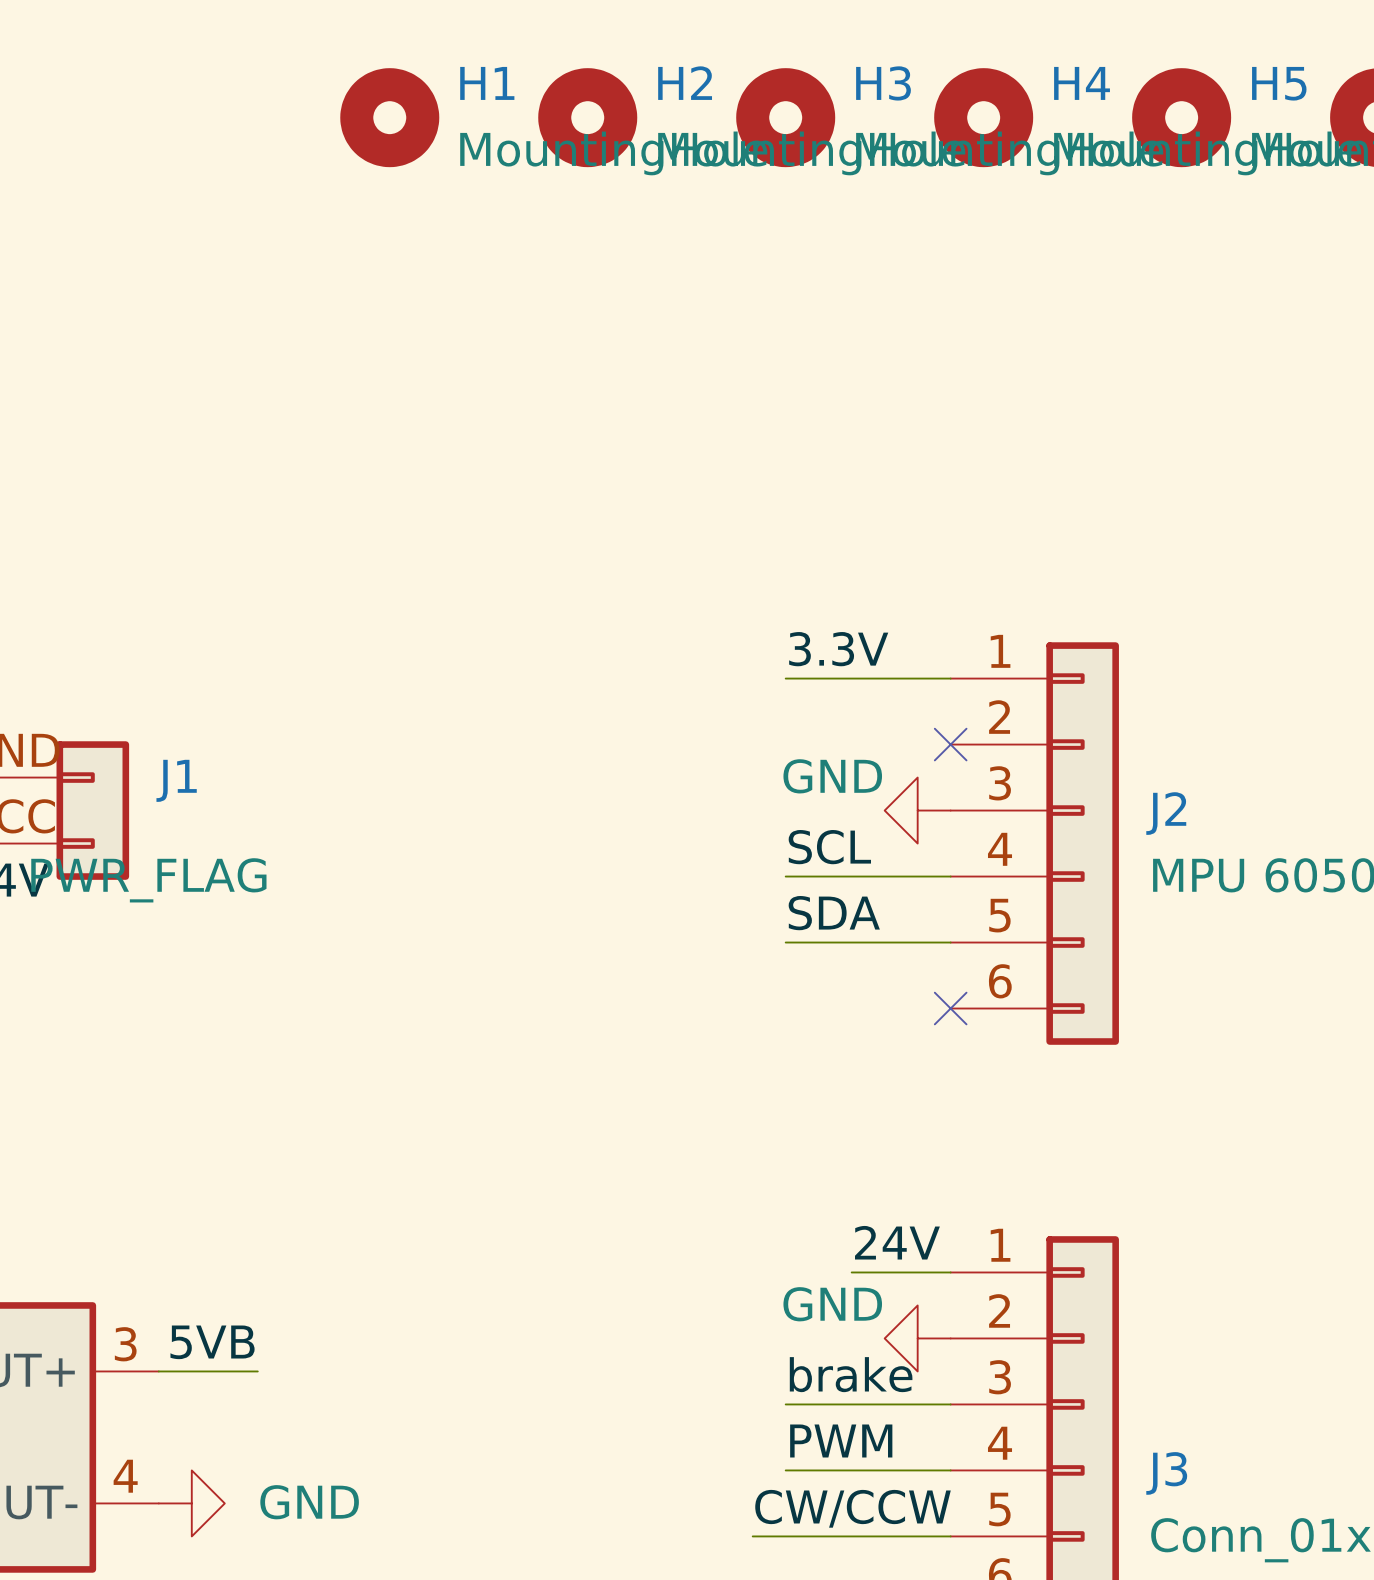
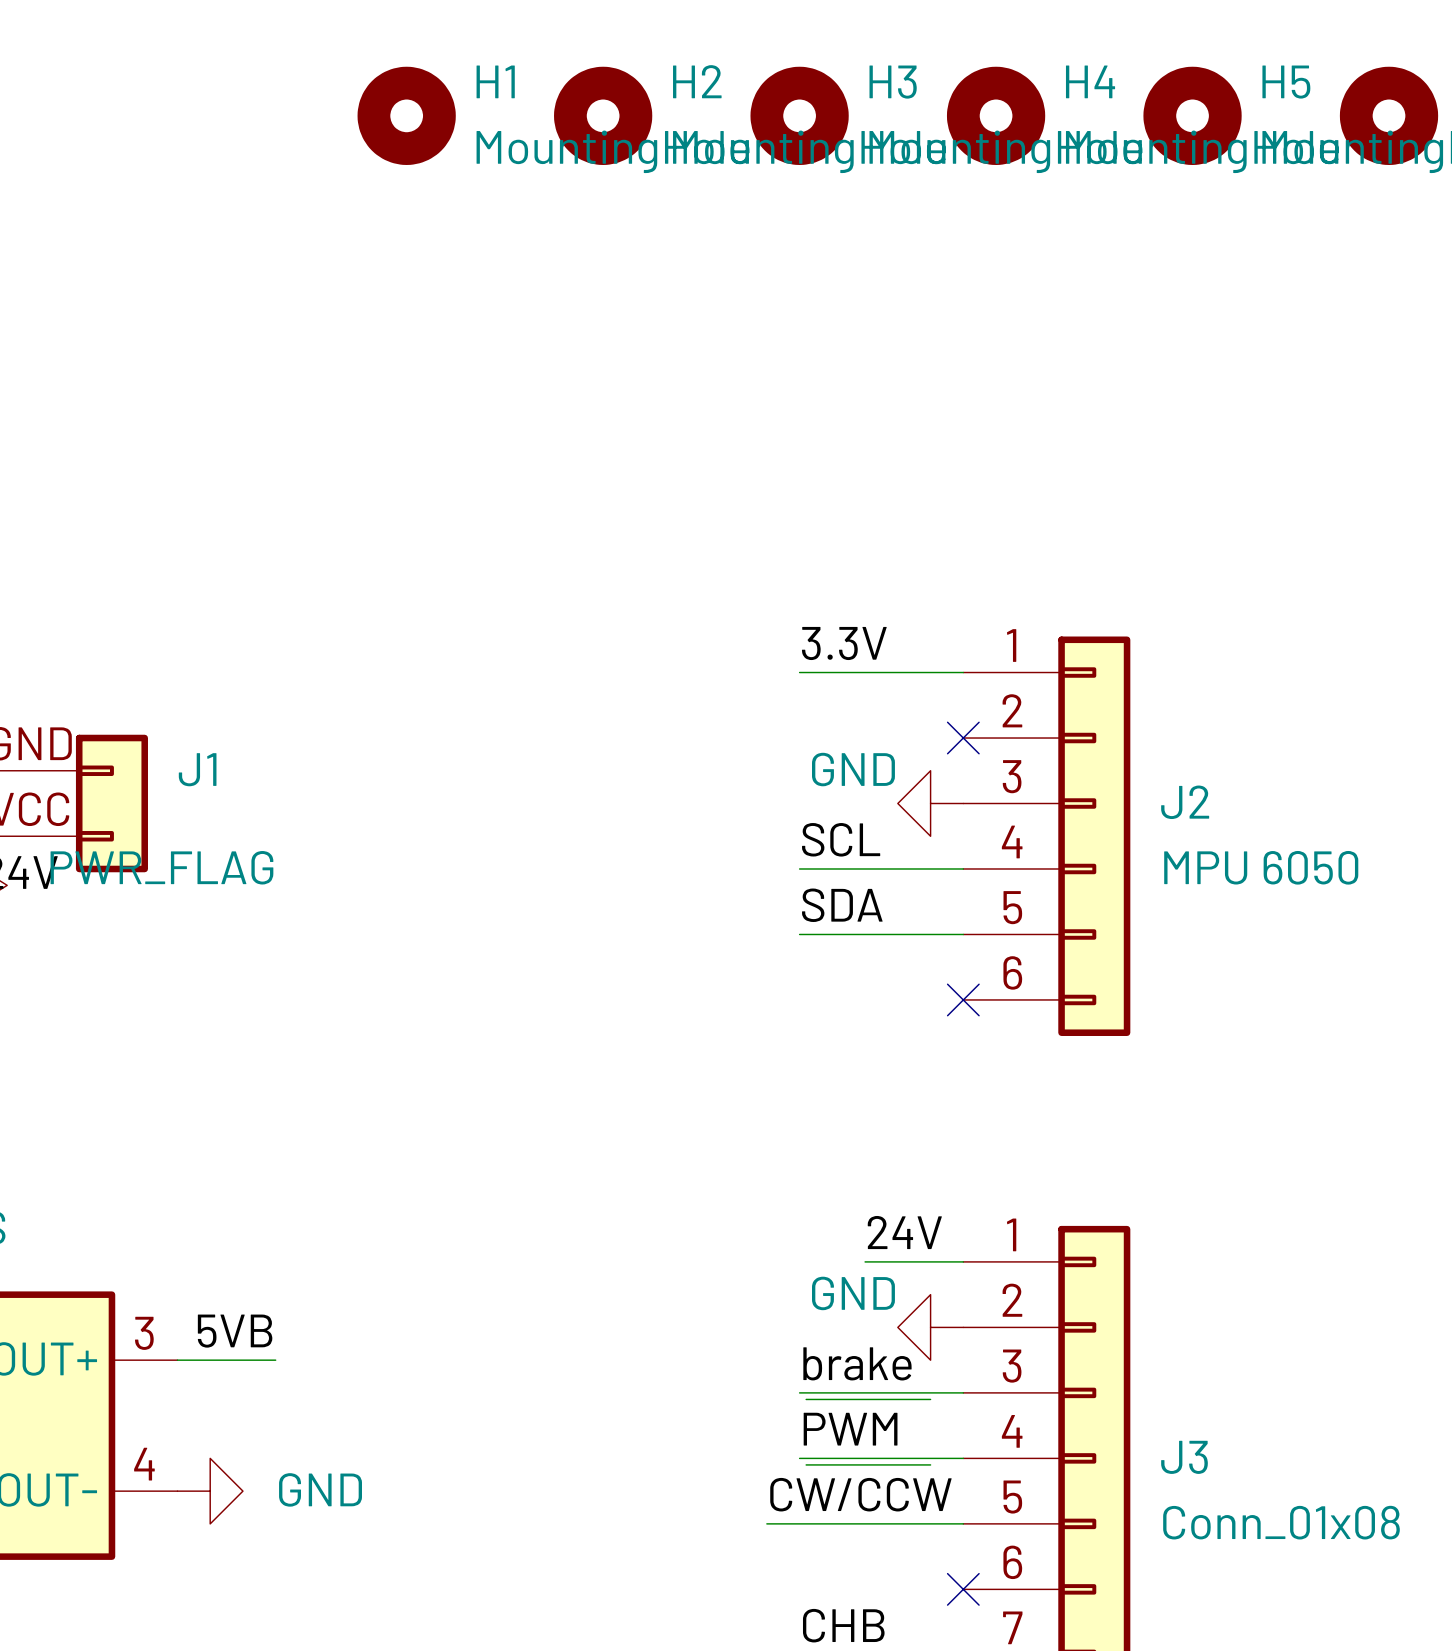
wire: none -> (806, 1399) (930, 1399)
wire: none -> (806, 1464) (930, 1464)

